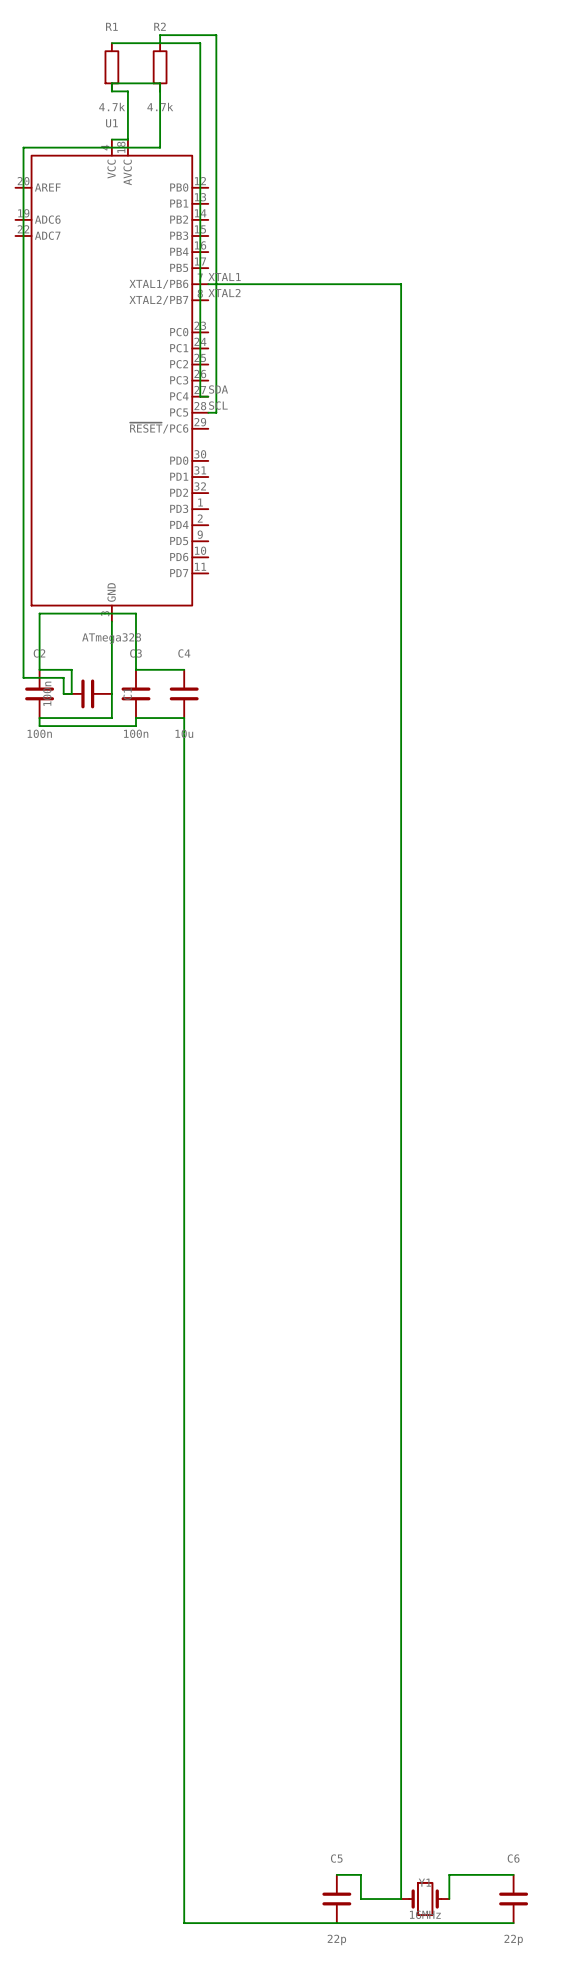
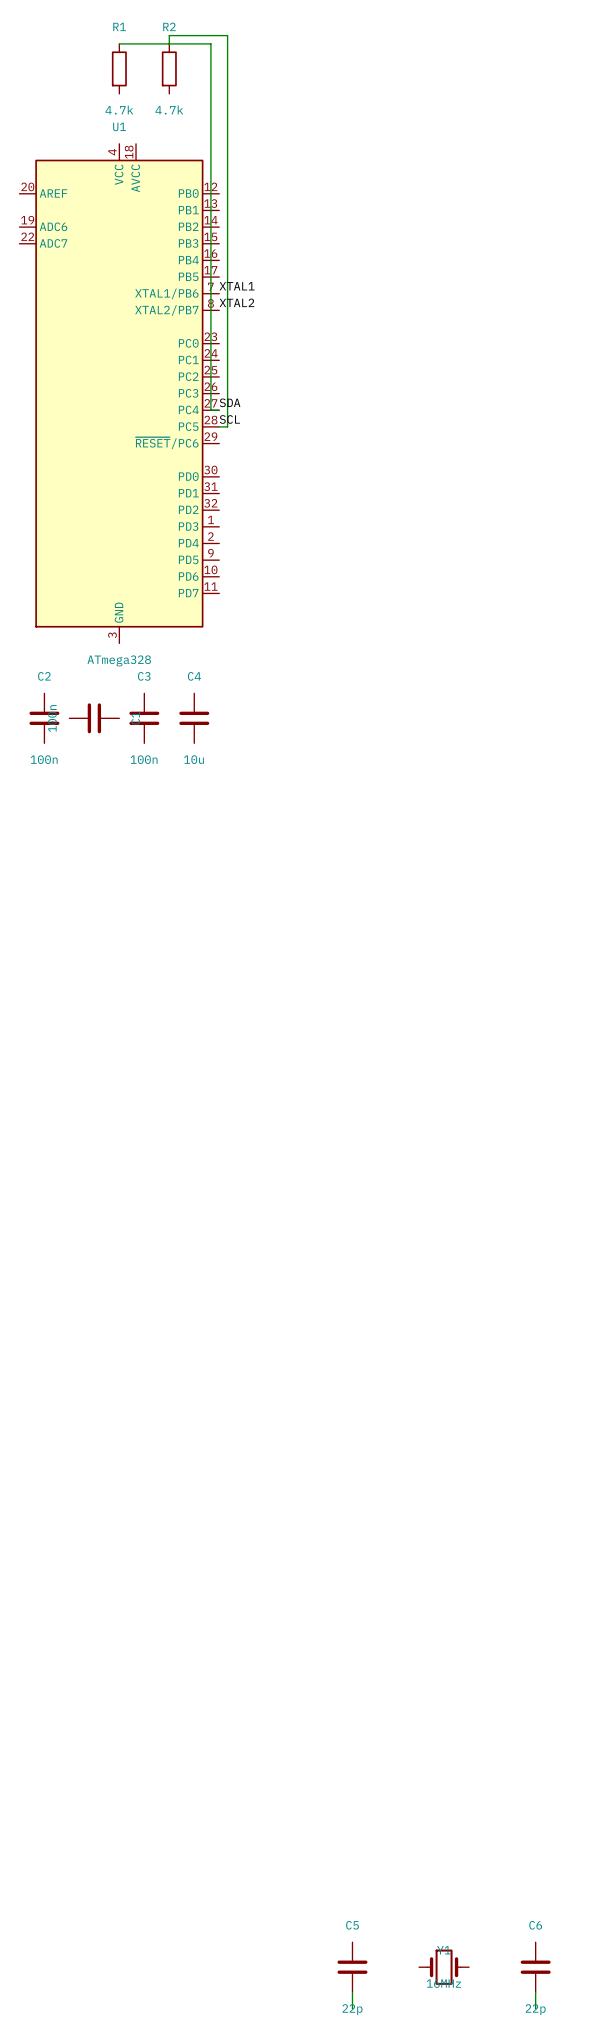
wire: (111, 139) (127, 139) (127, 91) (111, 91) (111, 83) (160, 83) (160, 147) (23, 147) (23, 677) (63, 677) (63, 693) (71, 693) (71, 669) (39, 669) (39, 613) (135, 613) (135, 669) (184, 669) -> none
wire: (208, 284) (401, 284) (401, 1899) (360, 1899) (360, 1874) (336, 1874) -> none
wire: (111, 621) (111, 718) (39, 718) (39, 726) (135, 726) (135, 718) (184, 718) (184, 1923) (513, 1923) -> (535, 2008) (535, 1992)
wire: (513, 1874) (449, 1874) (449, 1899) -> none
wire: none -> (352, 1992) (352, 2008)

